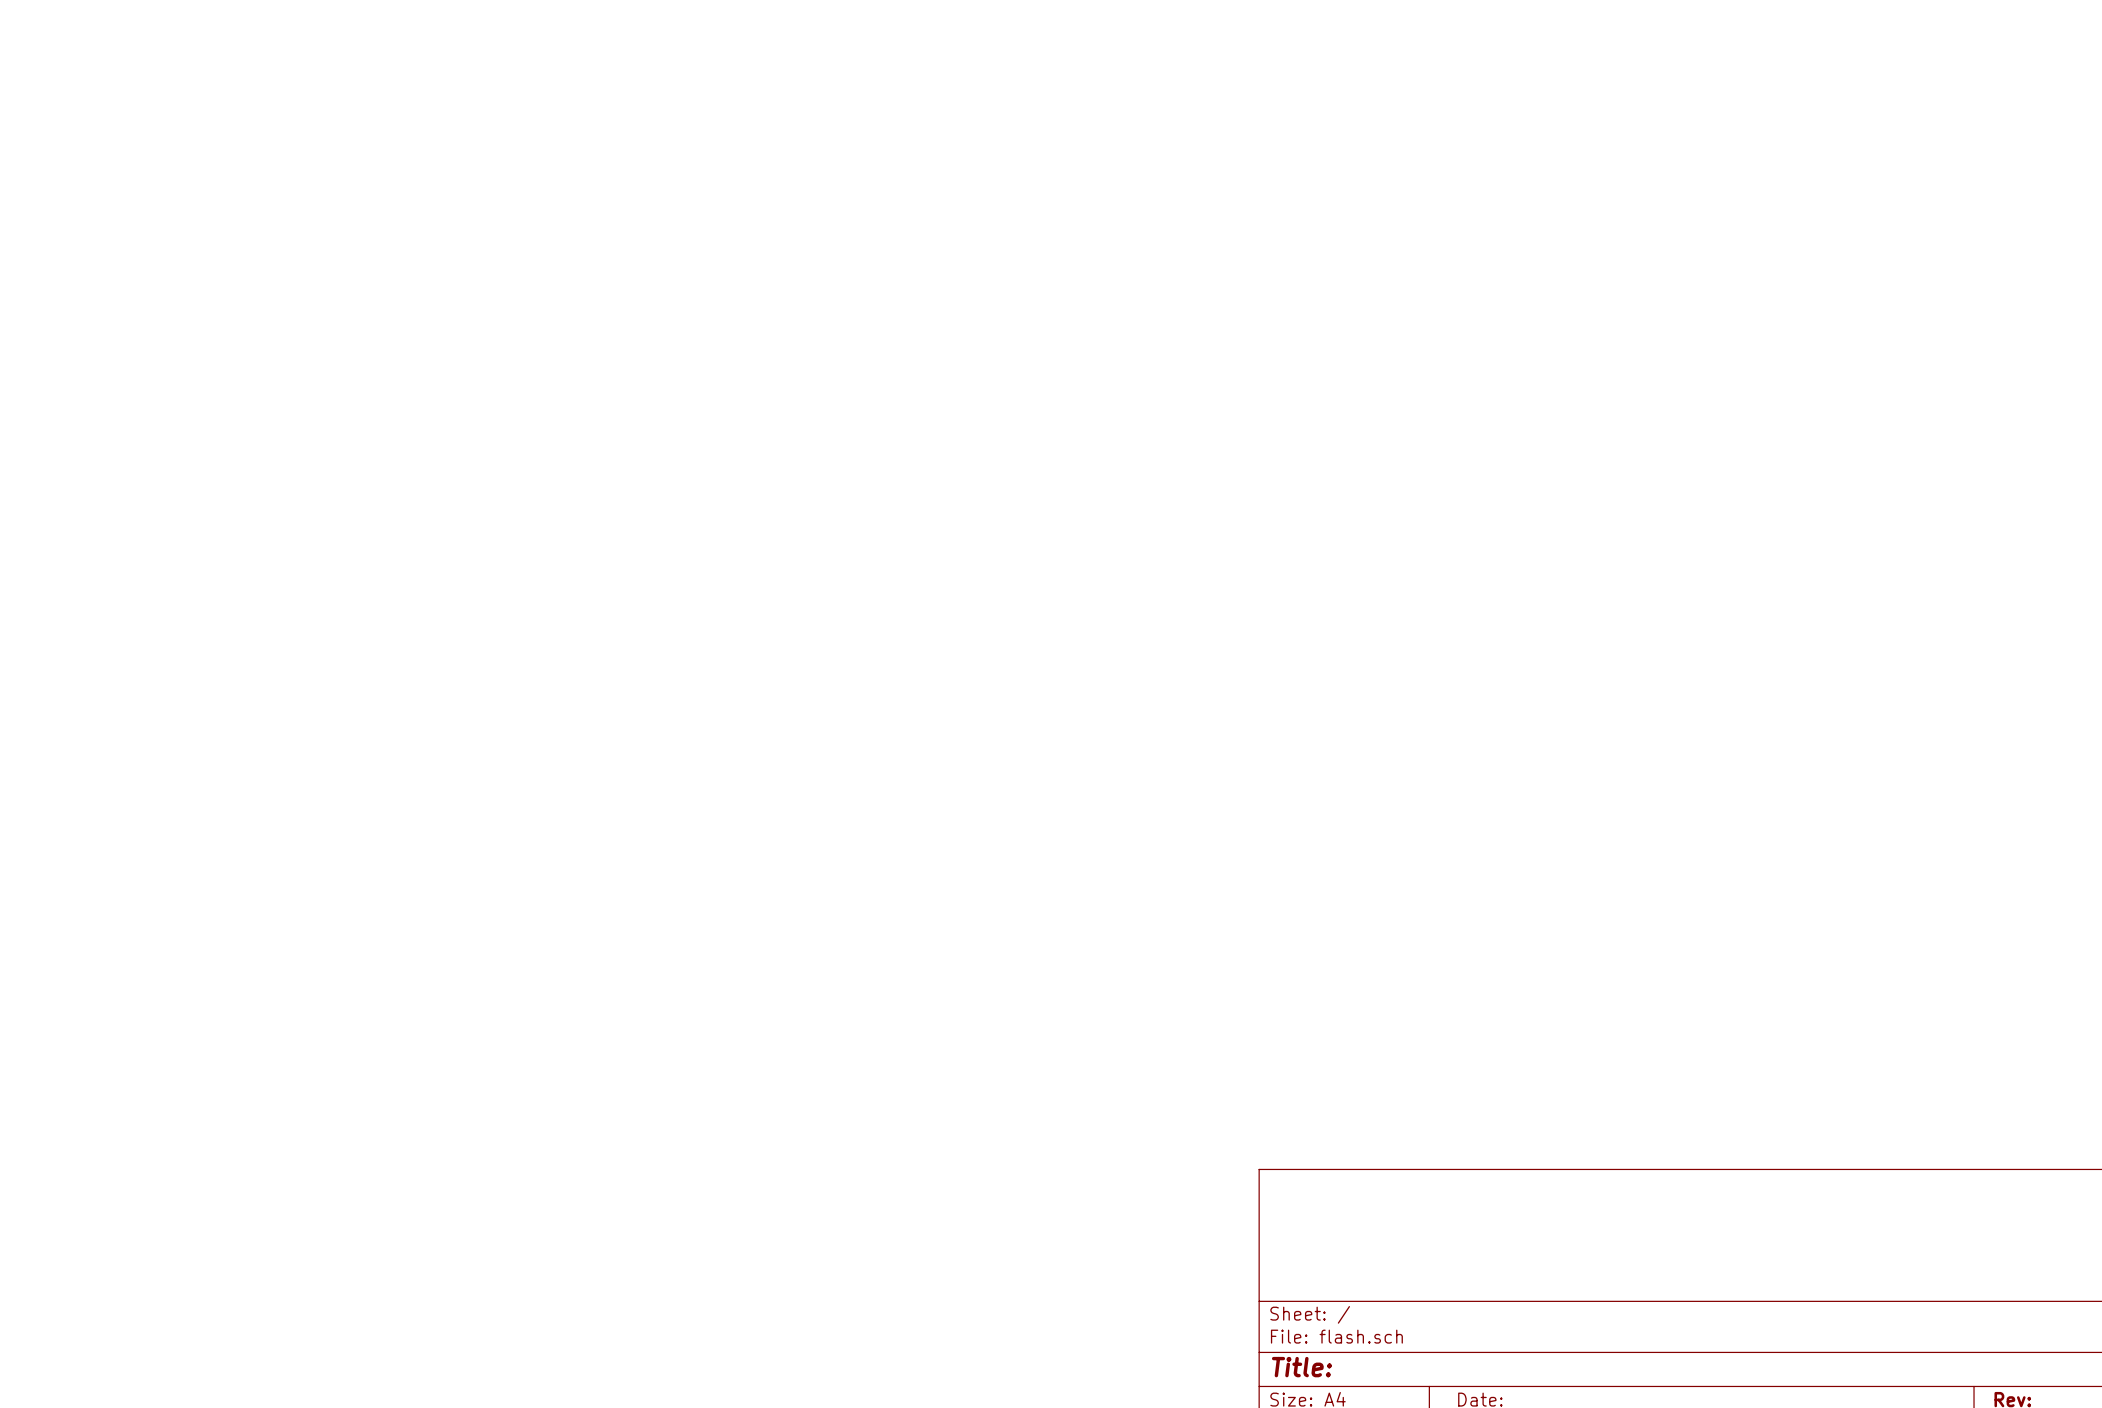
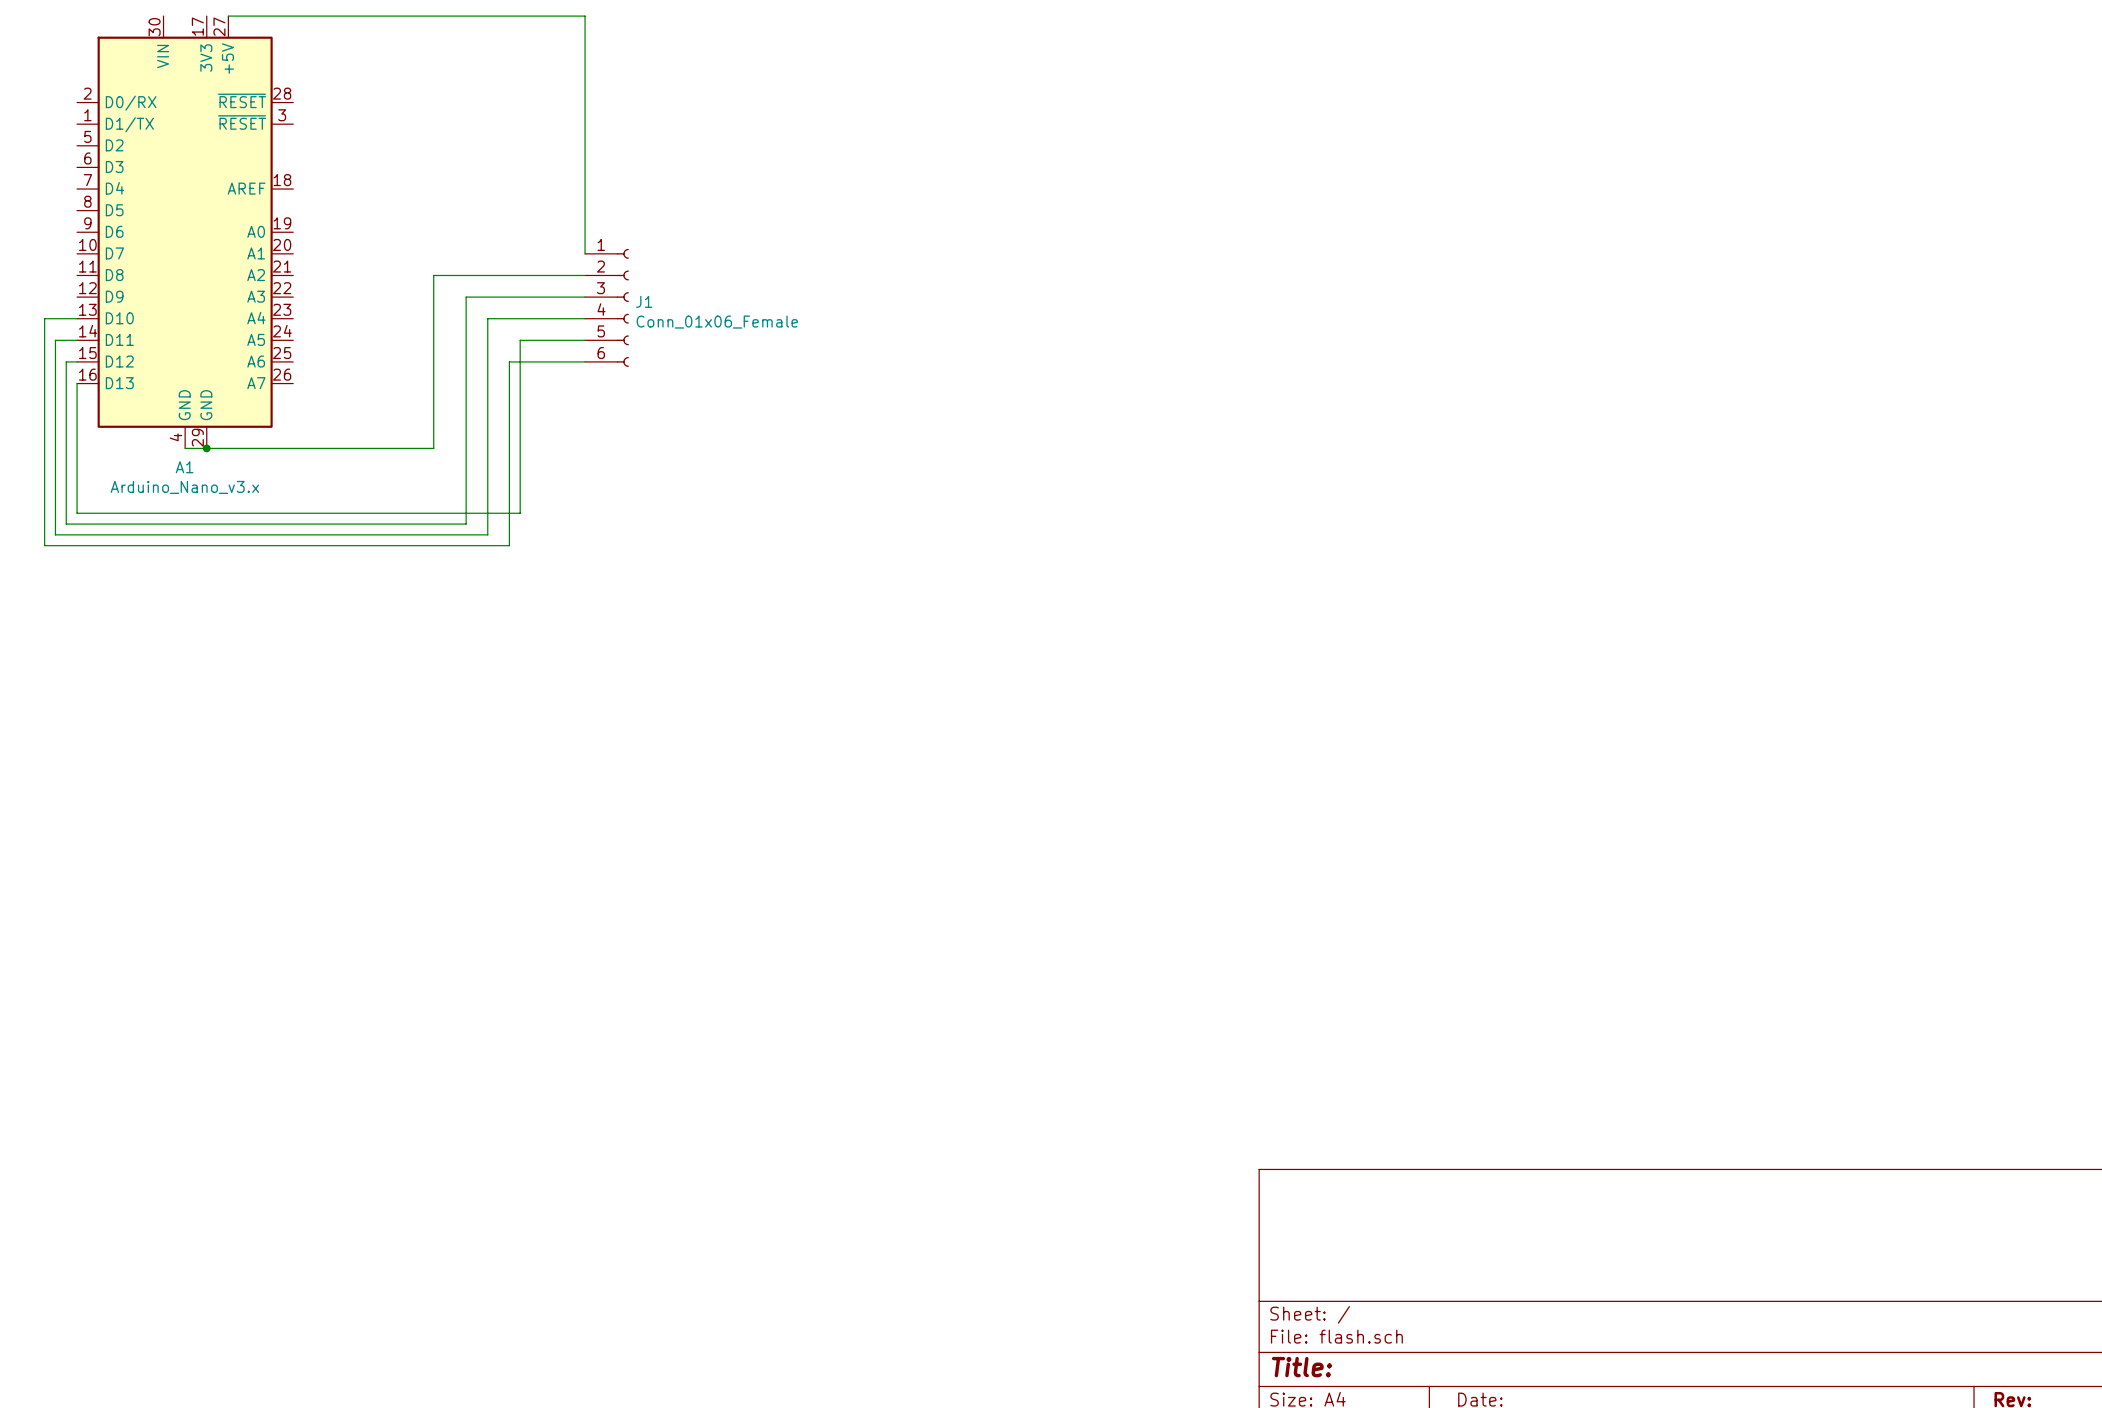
wire: none -> (228, 16) (585, 16) (585, 253)
A1: none -> Arduino_Nano_v3.x (185, 232)
wire: none -> (585, 275) (433, 275) (433, 448) (185, 448)
wire: none -> (585, 297) (466, 297) (466, 524) (66, 524) (66, 361) (77, 361)
J1: none -> Conn_01x06_Female (606, 307)
wire: none -> (77, 318) (44, 318) (44, 545) (509, 545) (509, 361) (585, 361)
wire: none -> (585, 318) (487, 318) (487, 534) (55, 534) (55, 340) (77, 340)
wire: none -> (585, 340) (520, 340) (520, 513) (77, 513) (77, 383)
junction: none -> (206, 448)

